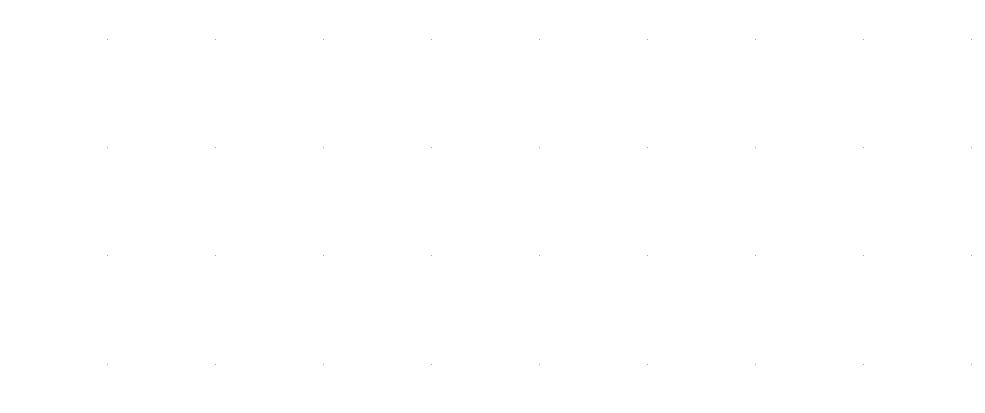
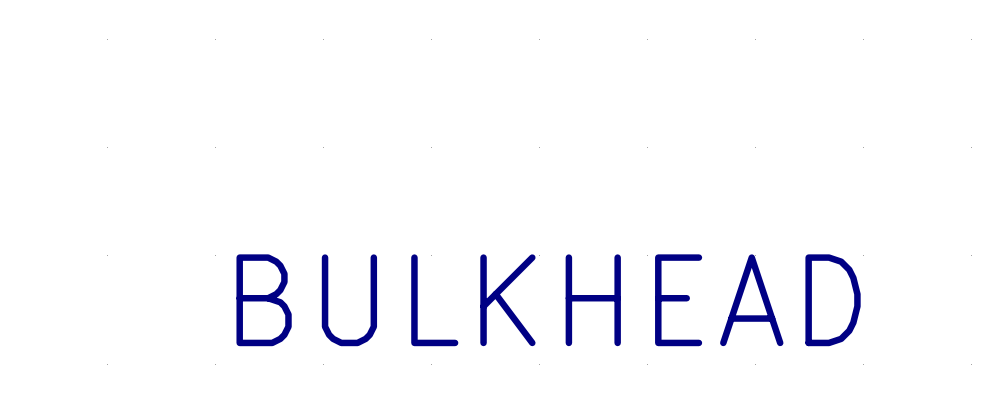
text: none -> BULKHEAD (548, 300)

